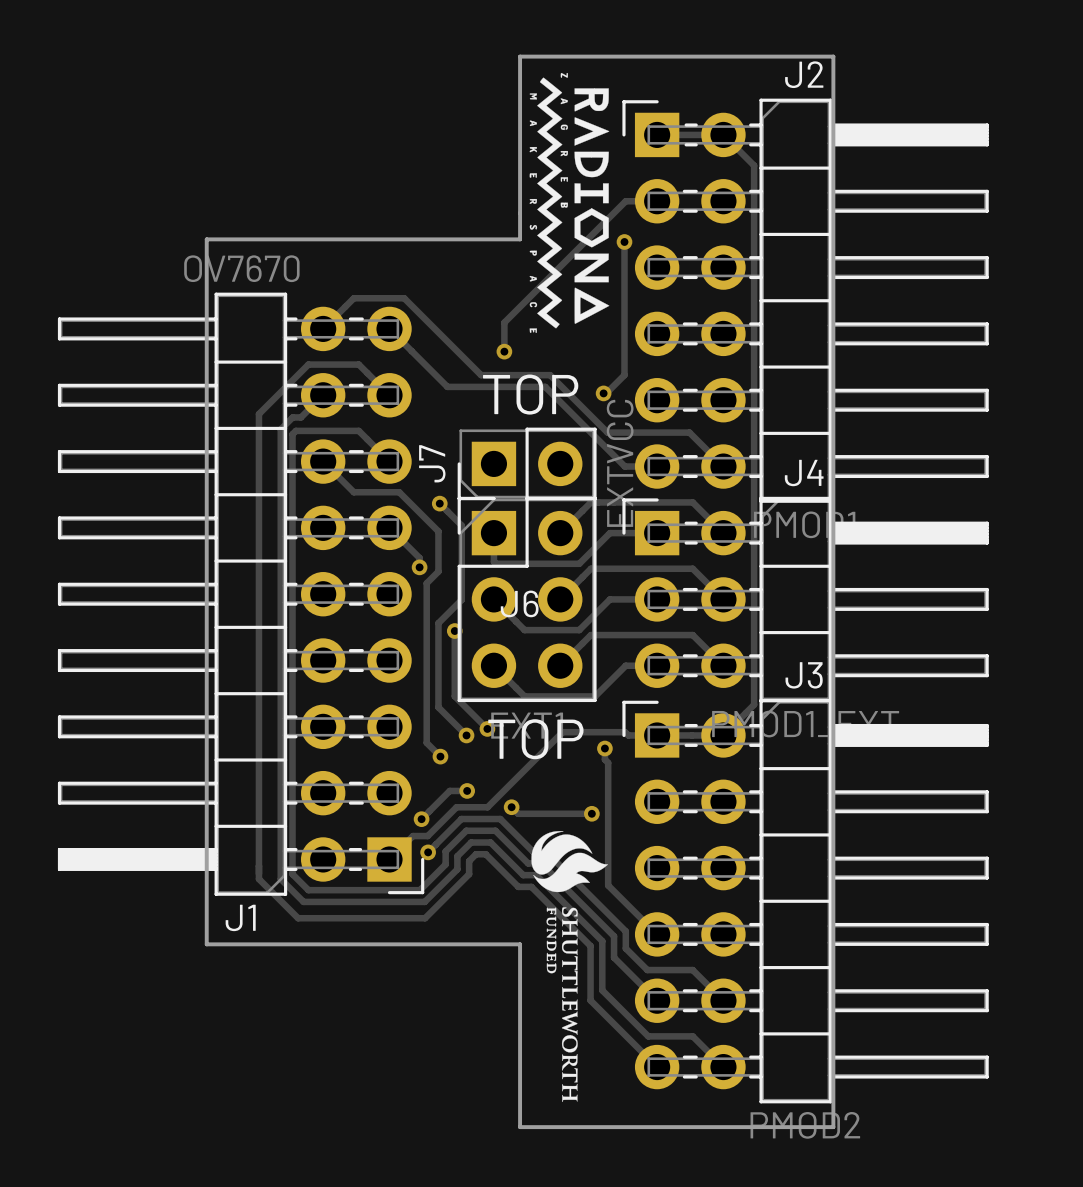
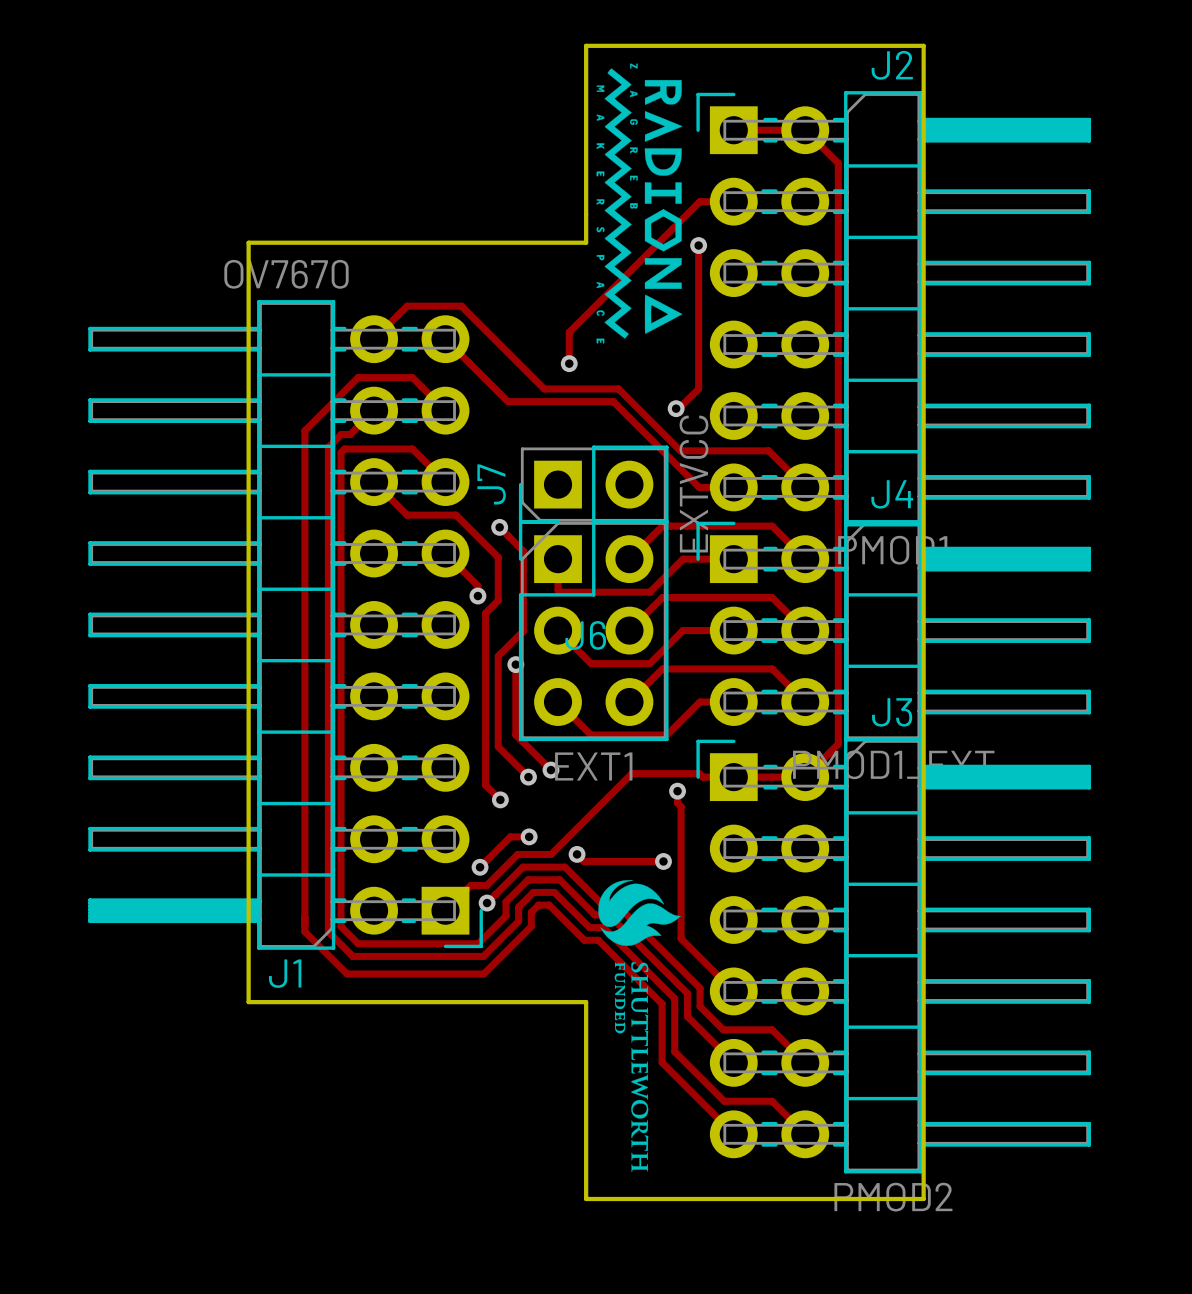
text: TOP (530, 394) -> none
text: TOP (535, 739) -> none

